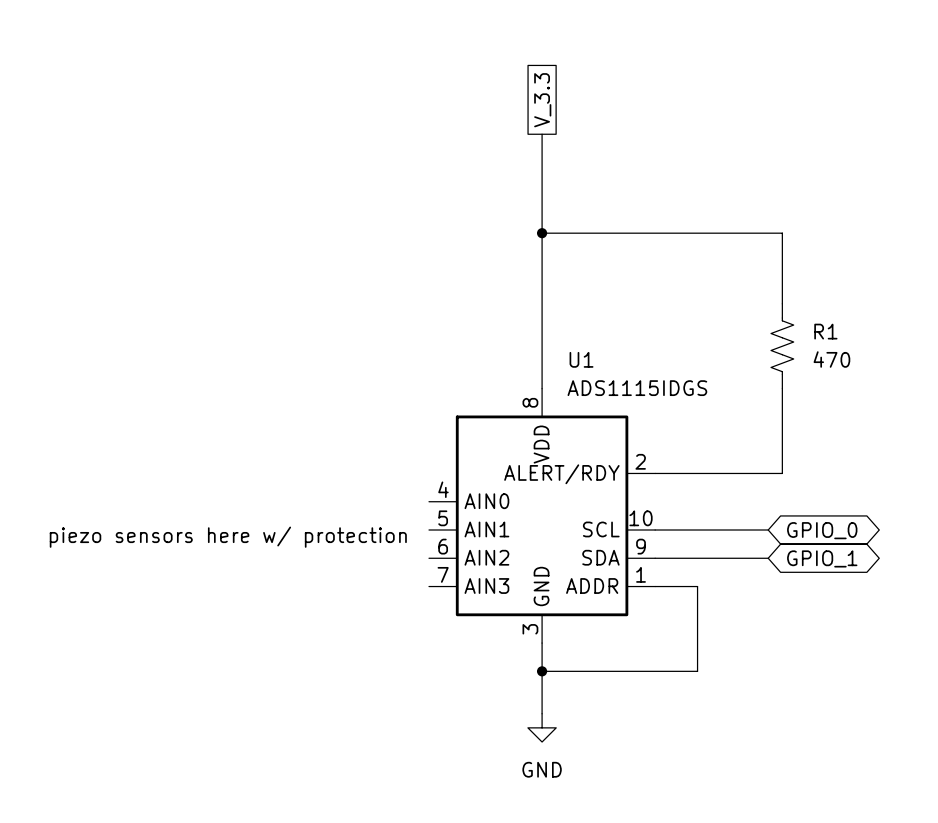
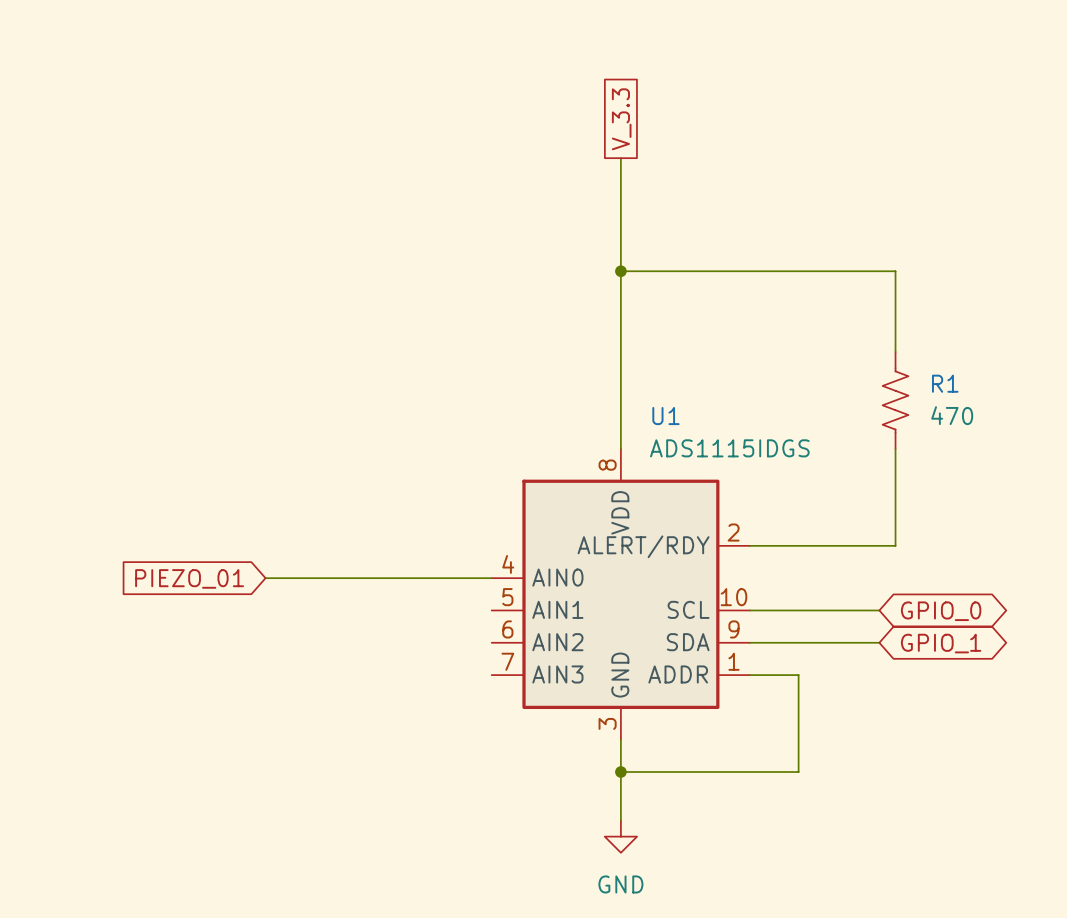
wire: none -> (265, 578) (491, 578)
global label: none -> PIEZO_01 (189, 578)
text: piezo sensors here w/ protection (228, 537) -> none

